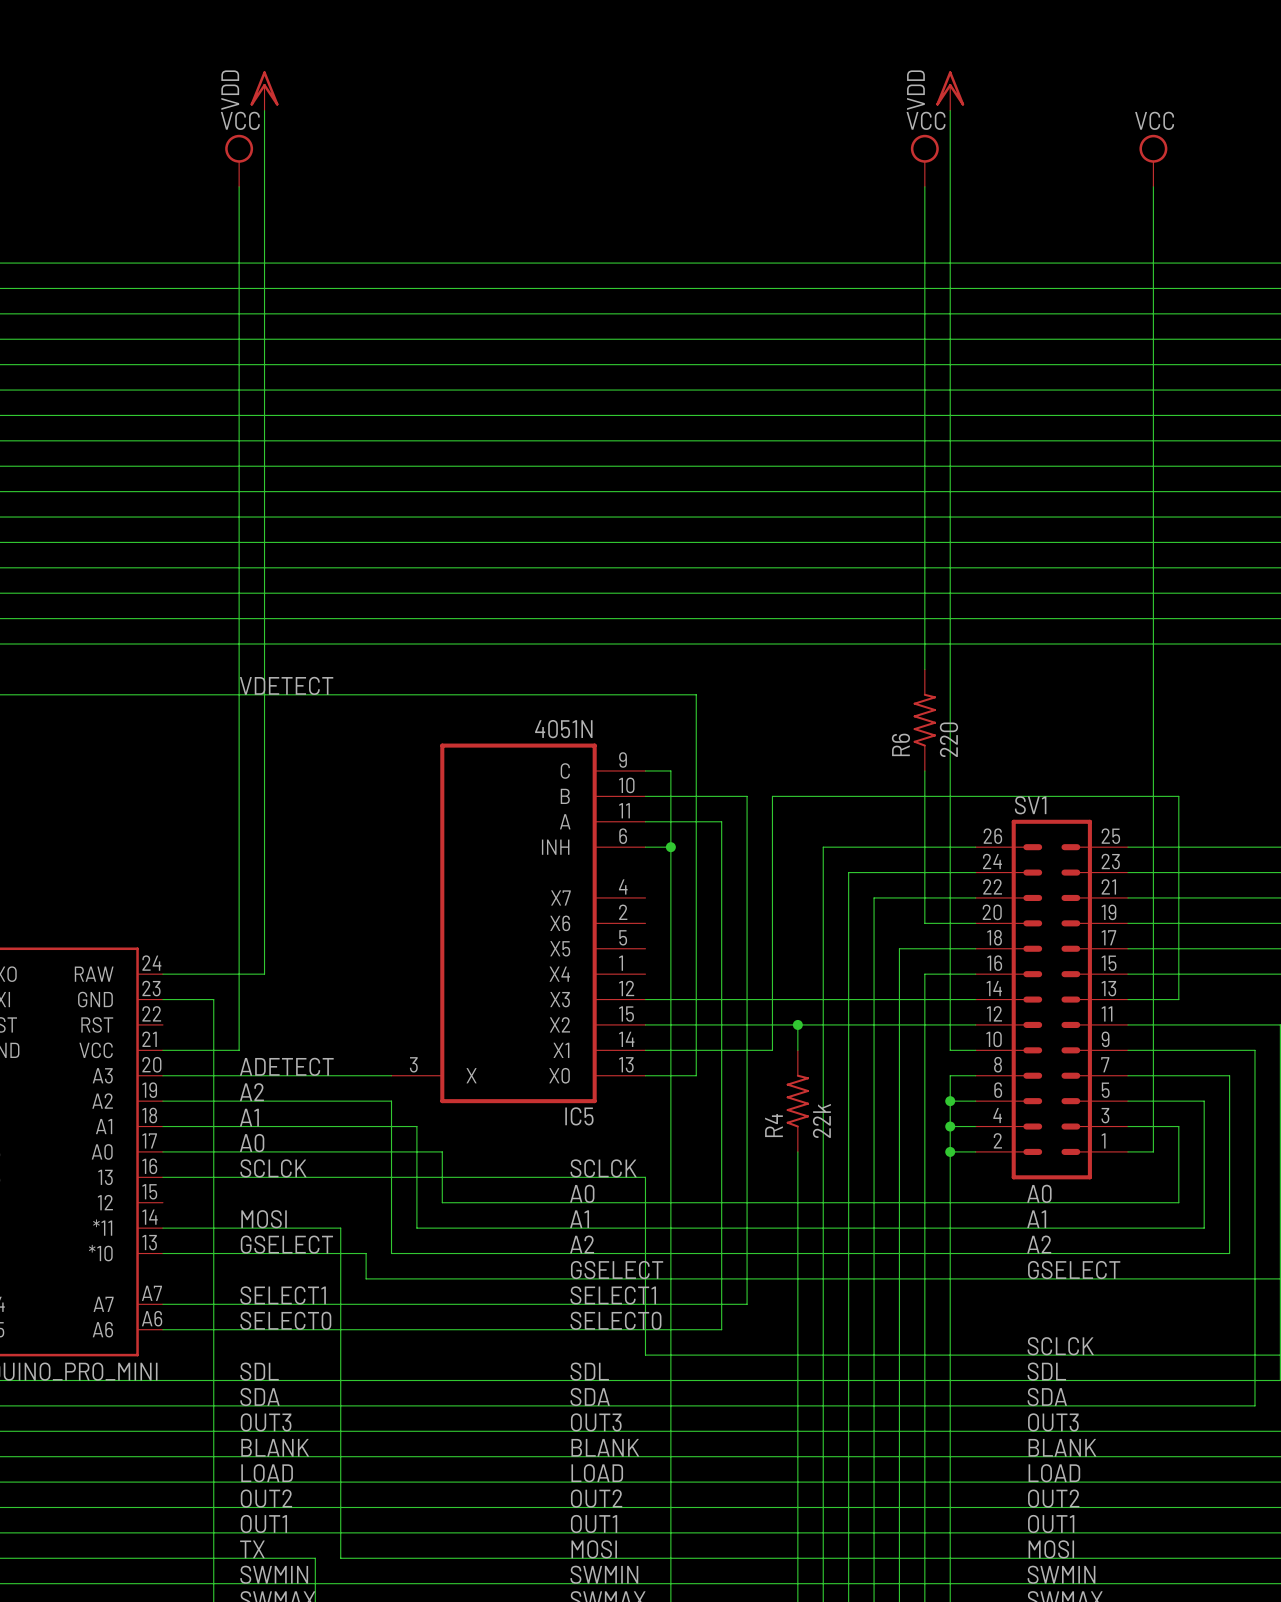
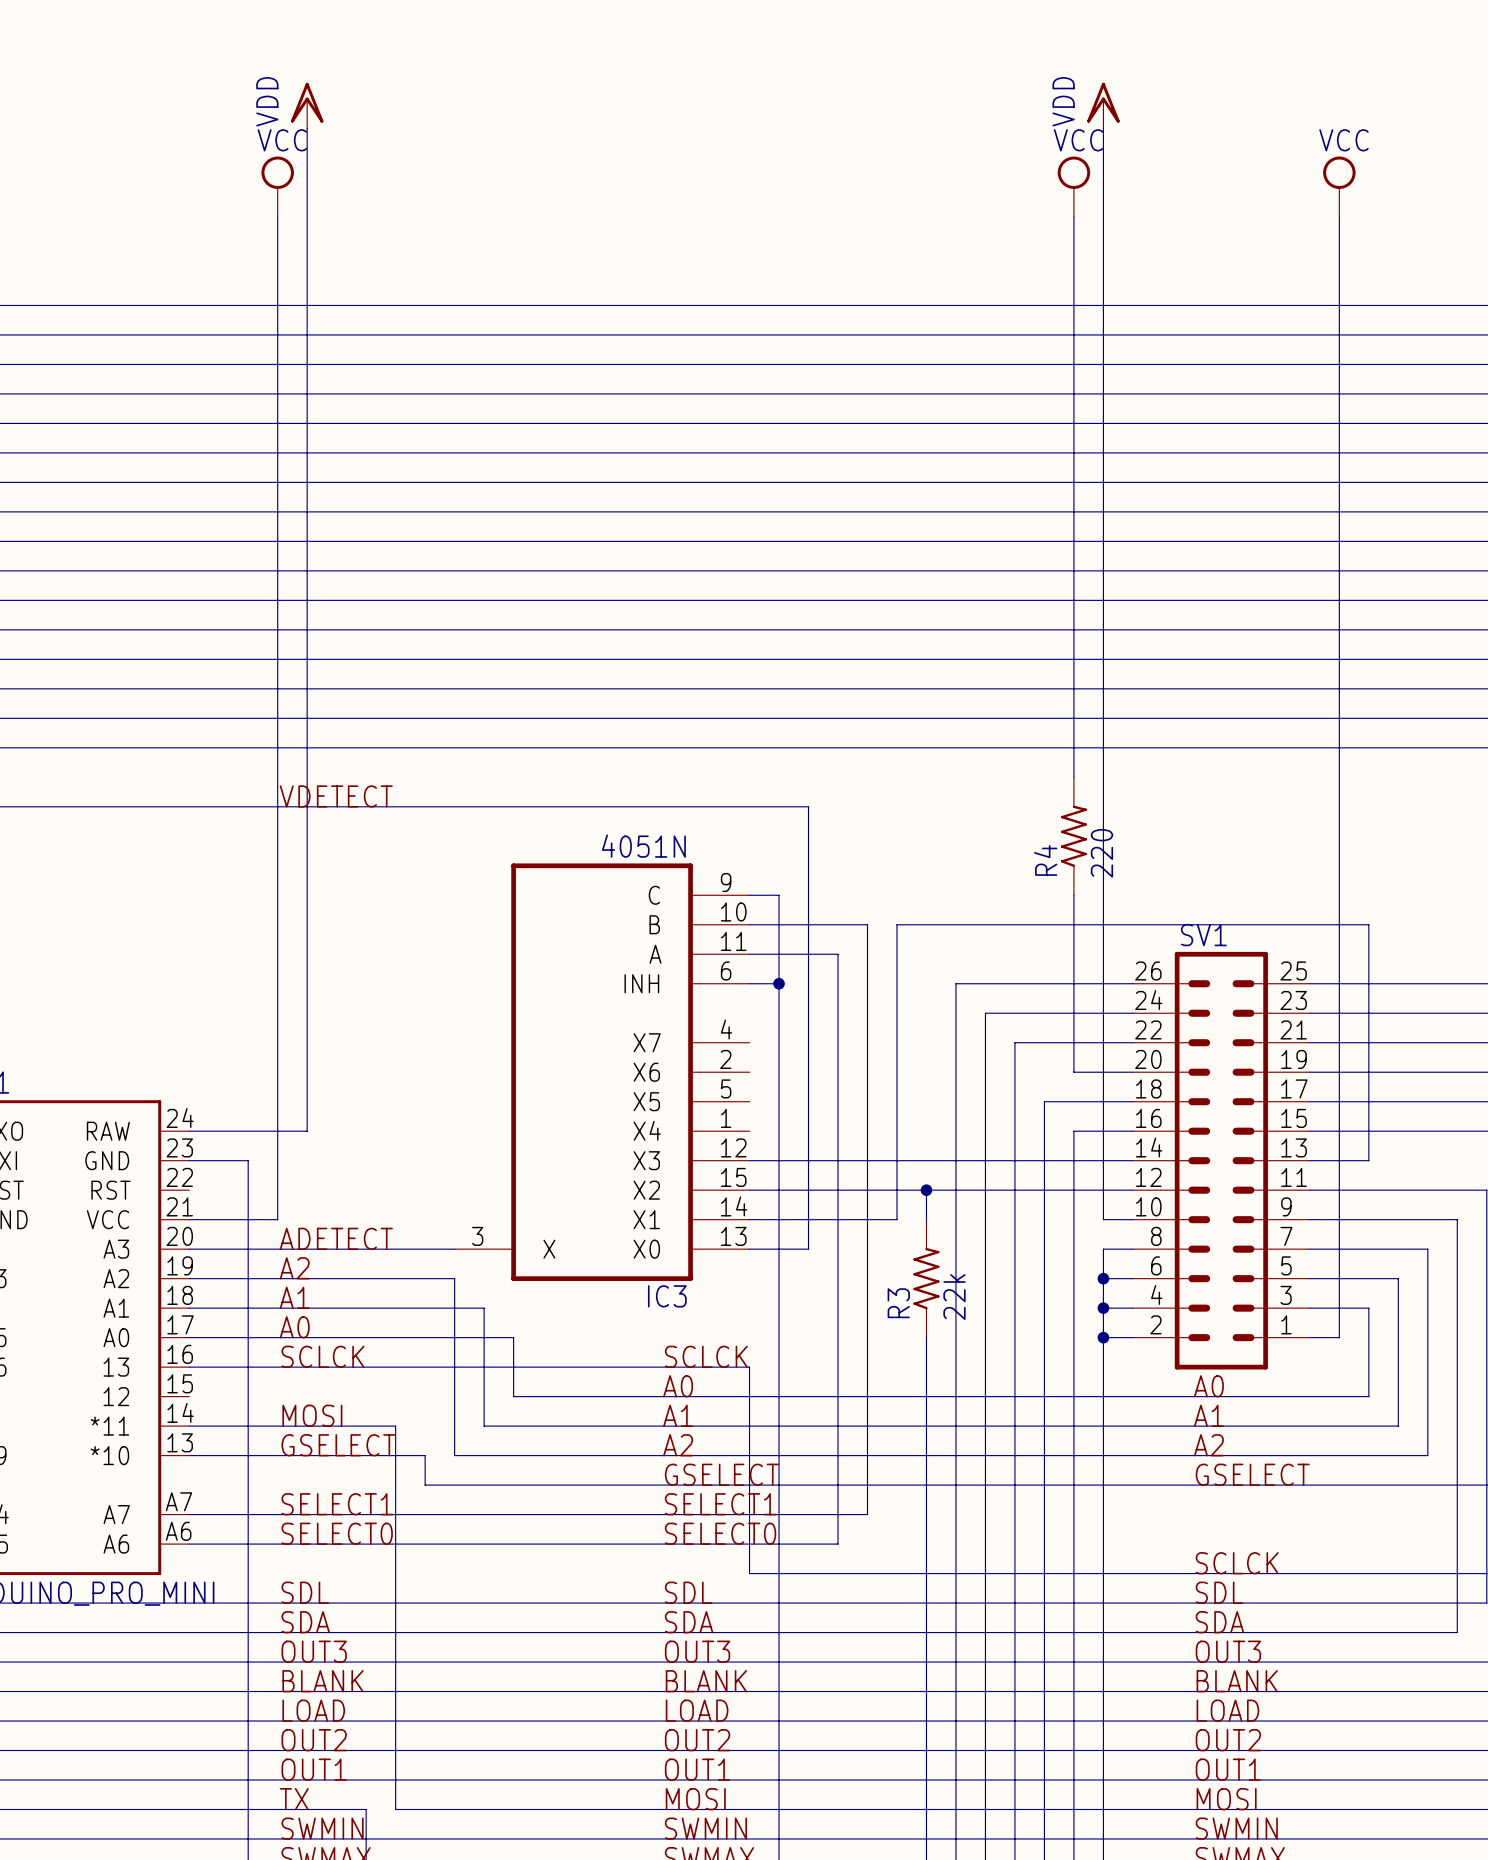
R6 name: R6 (900, 744) -> R4 (1045, 860)
IC5 name: IC5 (579, 1116) -> IC3 (667, 1296)
R4 name: R4 (773, 1125) -> R3 (898, 1303)

